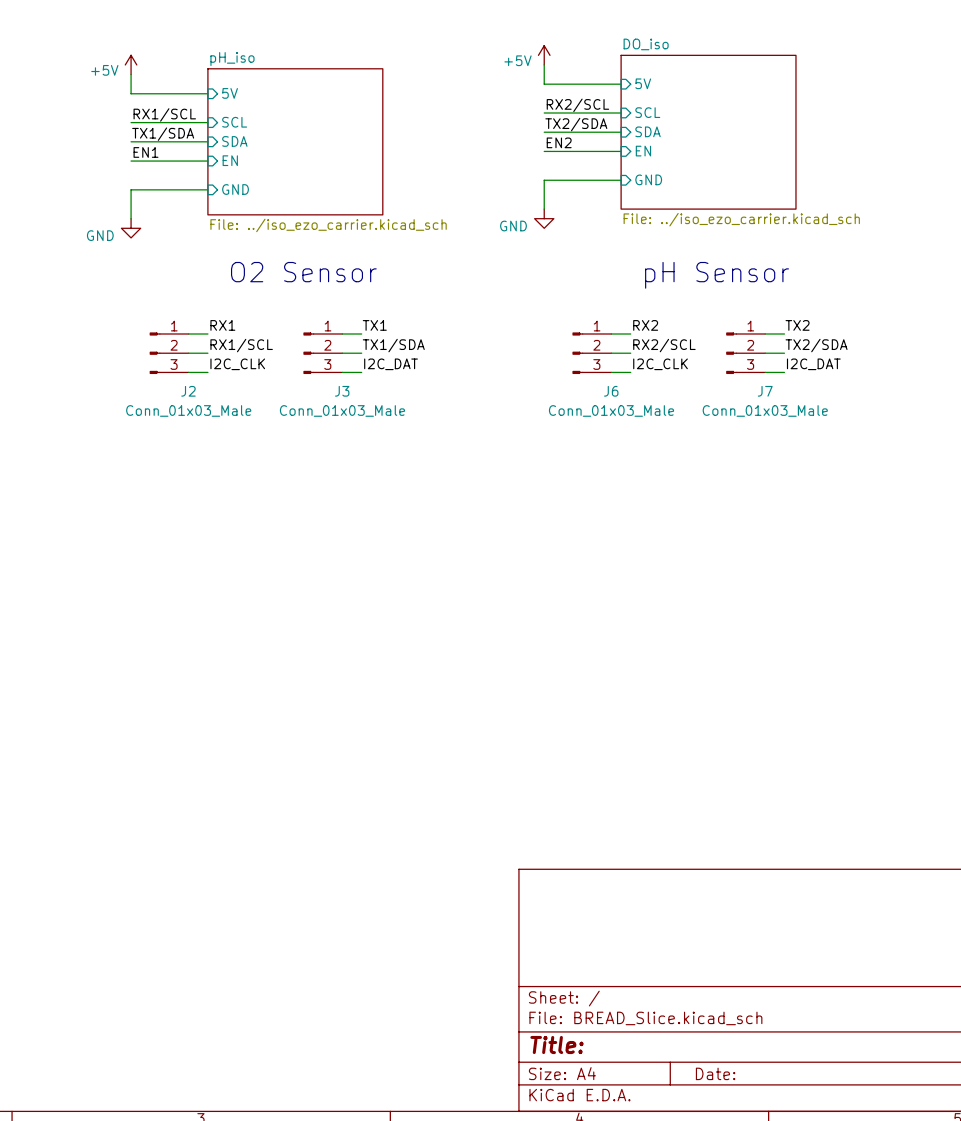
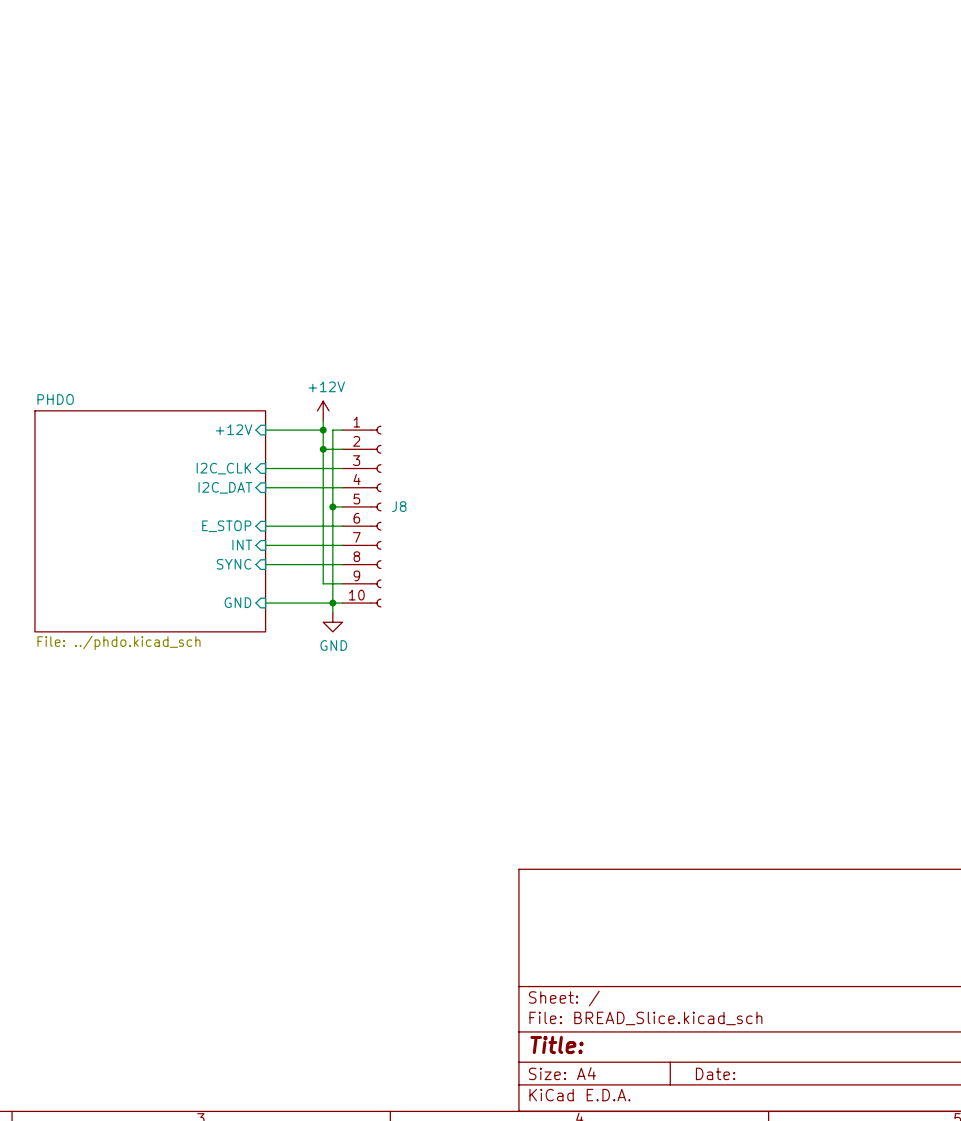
power symbol: +5V (544, 55) -> none
power symbol: +5V (131, 64) -> none
wire: (544, 64) (544, 84) (621, 84) -> none
wire: (131, 74) (131, 93) (207, 93) -> none
sheet pin: 5V (643, 83) -> none
sheet pin: 5V (230, 93) -> none
label: RX2/SCL (577, 105) -> none
wire: (544, 112) (621, 112) -> none
sheet pin: SCL (647, 112) -> none
label: RX1/SCL (164, 114) -> none
wire: (131, 122) (207, 122) -> none
sheet pin: SCL (234, 122) -> none
label: TX2/SDA (576, 124) -> none
sheet pin: SDA (648, 131) -> none
wire: (544, 132) (621, 132) -> none
sheet DO_iso: File: ../iso_ezo_carrier.kicad_sch (708, 132) -> none
label: TX1/SDA (163, 134) -> none
wire: (131, 141) (207, 141) -> none
sheet pin: SDA (234, 141) -> none
sheet pH_iso: File: ../iso_ezo_carrier.kicad_sch (295, 141) -> none
label: EN2 (559, 142) -> none
wire: (544, 151) (621, 151) -> none
sheet pin: EN (643, 151) -> none
label: EN1 (146, 152) -> none
sheet pin: EN (230, 160) -> none
wire: (131, 161) (207, 161) -> none
sheet pin: GND (648, 179) -> none
wire: (621, 180) (544, 180) (544, 209) -> none
wire: (207, 189) (131, 189) (131, 218) -> none
sheet pin: GND (235, 189) -> none
power symbol: GND (544, 218) -> none
power symbol: GND (131, 228) -> none
text: O2 Sensor (303, 272) -> none
text: pH Sensor (717, 275) -> none
label: RX1 (222, 325) -> none
label: TX1 (374, 325) -> none
label: RX2 (645, 325) -> none
label: TX2 (797, 325) -> none
wire: (188, 333) (207, 333) -> none
wire: (342, 333) (361, 333) -> none
wire: (611, 333) (630, 333) -> none
wire: (765, 333) (784, 333) -> none
label: RX1/SCL (241, 345) -> none
label: TX1/SDA (393, 345) -> none
label: RX2/SCL (664, 345) -> none
label: TX2/SDA (816, 345) -> none
J2: Conn_01x03_Male (169, 353) -> none
wire: (188, 353) (207, 353) -> none
J3: Conn_01x03_Male (322, 353) -> none
wire: (342, 353) (361, 353) -> none
J6: Conn_01x03_Male (591, 353) -> none
wire: (611, 353) (630, 353) -> none
J7: Conn_01x03_Male (745, 353) -> none
wire: (765, 353) (784, 353) -> none
label: I2C_CLK (237, 364) -> none
label: I2C_DAT (391, 364) -> none
label: I2C_CLK (660, 364) -> none
label: I2C_DAT (813, 364) -> none
wire: (188, 372) (207, 372) -> none
wire: (342, 372) (361, 372) -> (323, 449) (342, 449)
wire: (611, 372) (630, 372) -> none
wire: (765, 372) (784, 372) -> none
power symbol: none -> +12V (323, 410)
wire: none -> (323, 420) (323, 583) (342, 583)
sheet pin: none -> +12V (234, 429)
wire: none -> (265, 430) (323, 430)
junction: none -> (323, 430)
wire: none -> (342, 430) (332, 430) (332, 612)
junction: none -> (323, 449)
sheet pin: none -> I2C_CLK (224, 468)
wire: none -> (265, 468) (342, 468)
sheet pin: none -> I2C_DAT (225, 487)
wire: none -> (265, 487) (342, 487)
wire: none -> (332, 506) (342, 506)
junction: none -> (332, 506)
J8: none -> (361, 516)
sheet PHDO: none -> File: ../phdo.kicad_sch (150, 521)
sheet pin: none -> E_STOP (226, 526)
wire: none -> (265, 526) (342, 526)
sheet pin: none -> INT (242, 545)
wire: none -> (265, 545) (342, 545)
sheet pin: none -> SYNC (234, 564)
wire: none -> (265, 564) (342, 564)
sheet pin: none -> GND (237, 602)
wire: none -> (265, 603) (342, 603)
junction: none -> (332, 603)
power symbol: none -> GND (332, 622)

